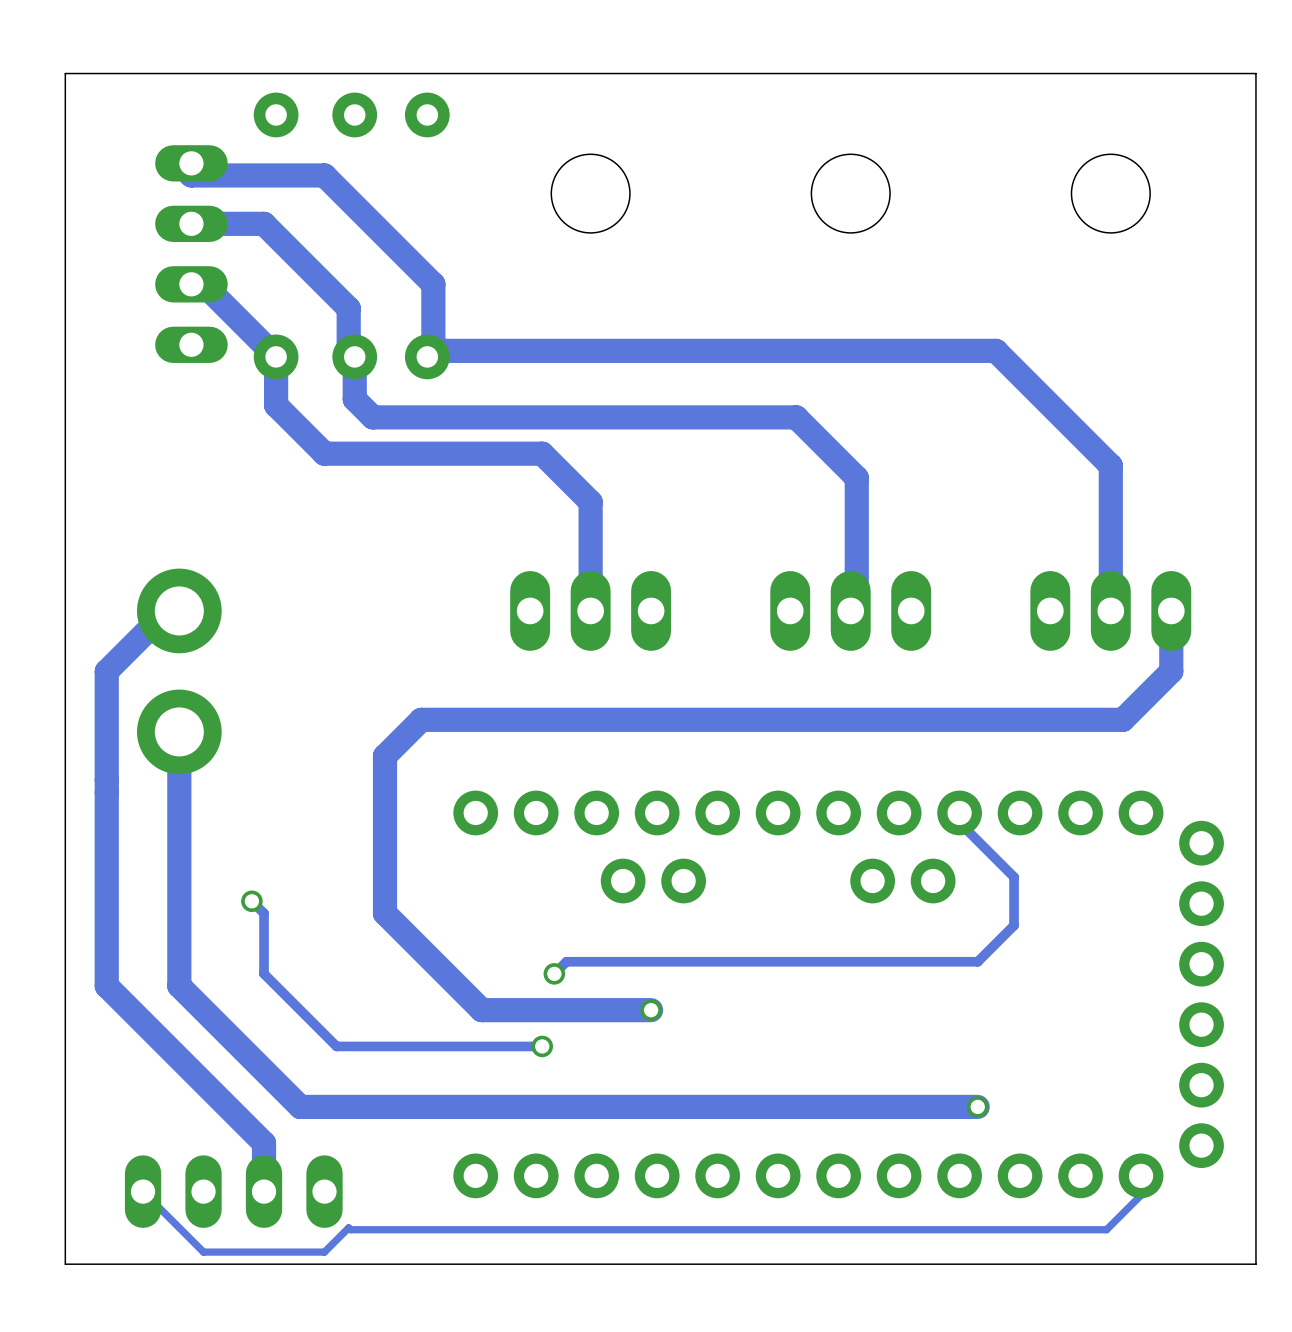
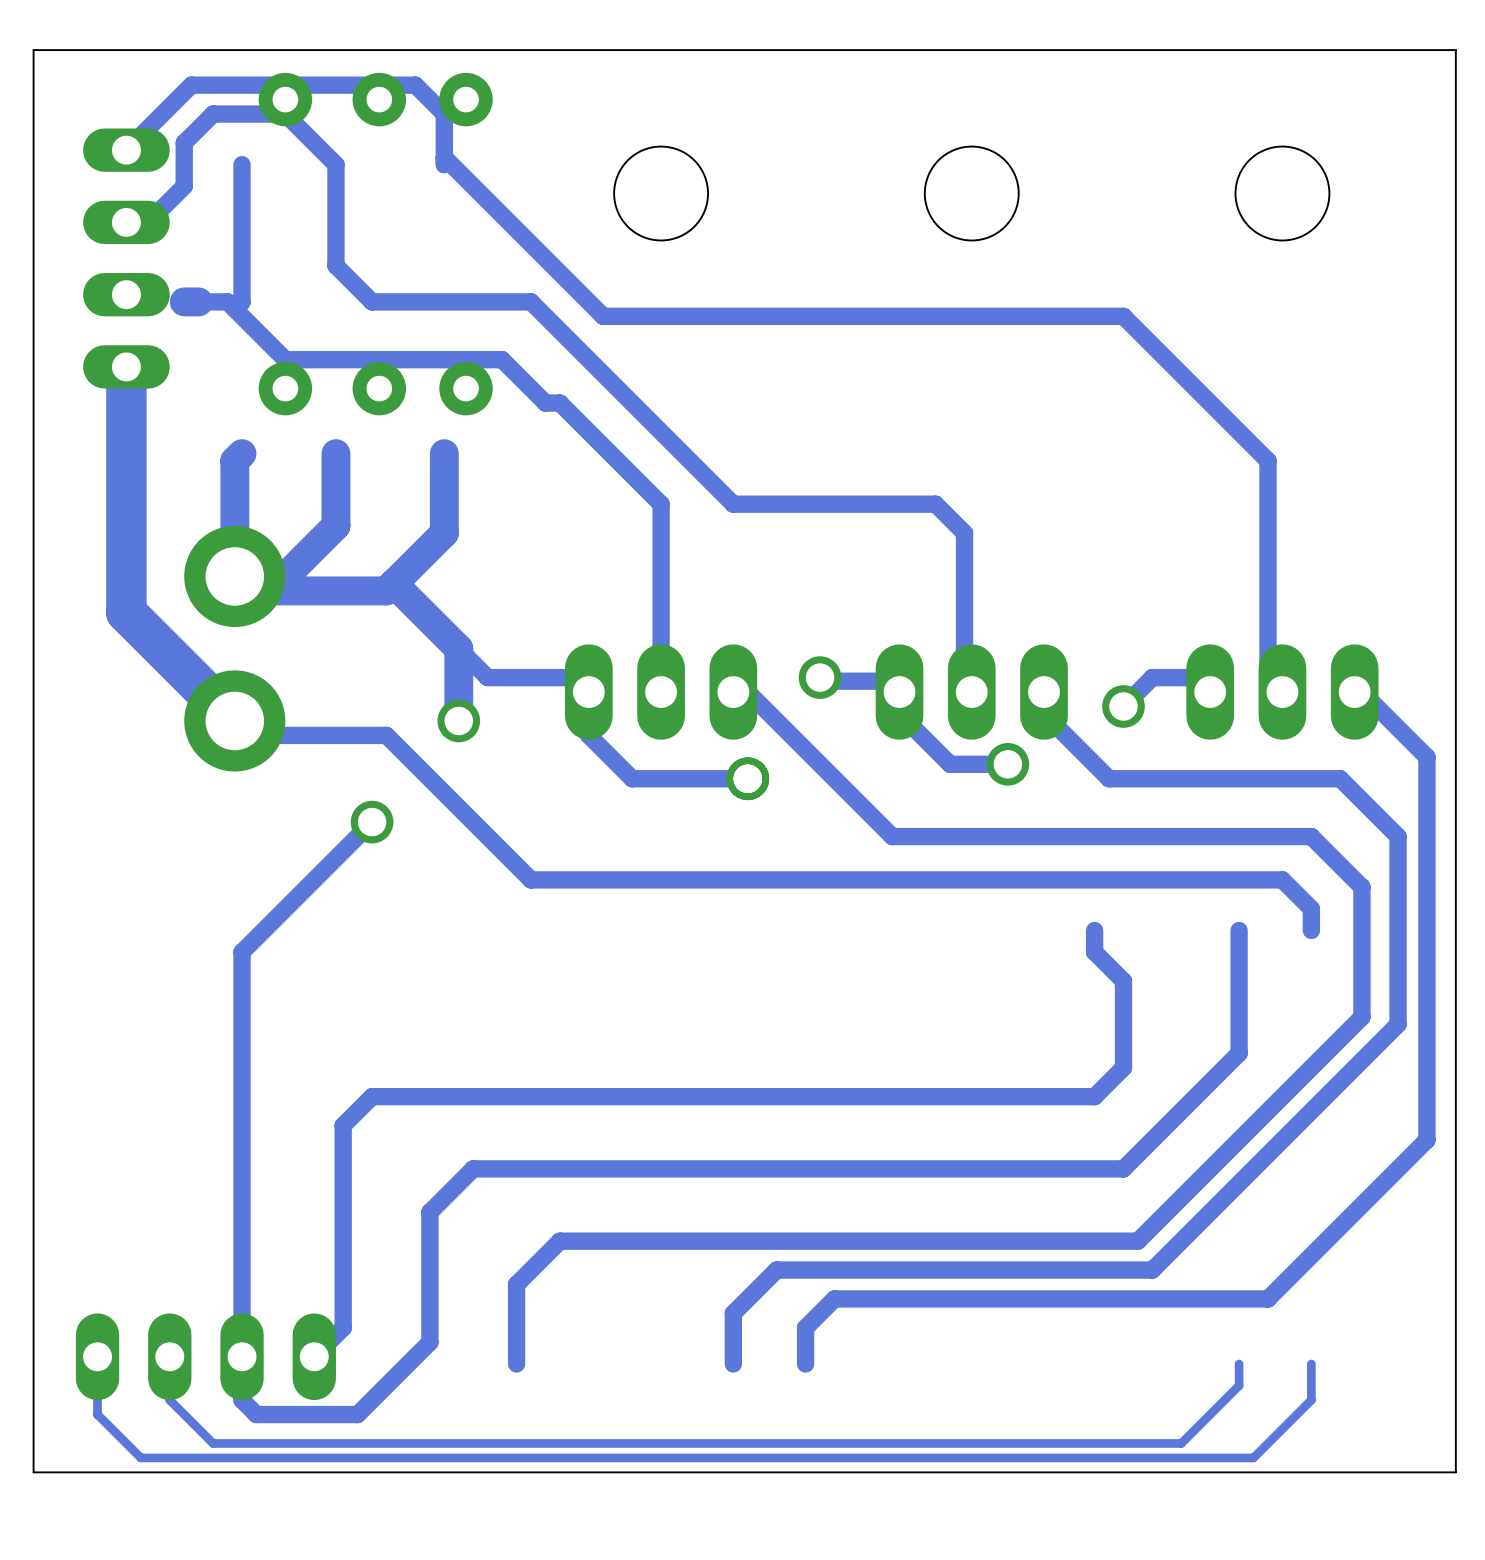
track: none -> (126, 150) (191, 85) (415, 85) (444, 114) (444, 164)
track: (191, 163) (179, 163) (191, 175) (324, 175) (433, 284) (433, 350) -> none
track: none -> (444, 157) (603, 316) (1123, 316) (1267, 460) (1267, 670) (1275, 677)
track: none -> (242, 164) (242, 301) (234, 309)
track: none -> (126, 222) (133, 215) (155, 215) (184, 186) (184, 142) (213, 114) (285, 114) (335, 164) (335, 265) (372, 301) (531, 301) (733, 504) (935, 504) (964, 533) (964, 673) (968, 677)
track: (191, 223) (264, 223) (348, 308) (348, 350) (354, 356) (354, 399) (372, 417) (796, 417) (856, 477) (856, 604) (850, 610) -> none
part position: (191, 254) -> (126, 258)
track: (203, 284) (276, 356) (276, 405) (324, 453) (542, 453) (590, 502) -> (198, 301) (227, 301) (285, 359) (502, 359) (545, 403) (559, 403) (661, 504) (661, 562)
track: none -> (126, 366) (126, 612) (249, 735) (386, 735) (531, 879) (1282, 879) (1311, 908) (1311, 930)
track: (433, 350) (995, 350) (1110, 465) (1110, 610) -> none
track: none -> (242, 453) (234, 460) (234, 576)
track: none -> (335, 453) (335, 525) (285, 576) (234, 576)
track: none -> (444, 453) (444, 533) (386, 590) (249, 590) (234, 576)
track width: thick (590, 502) (590, 598) -> thin (661, 562) (661, 677)
track: none -> (393, 583) (458, 648)
track: none -> (458, 648) (487, 677) (588, 677) (588, 735) (632, 778) (747, 778)
track: none -> (458, 648) (458, 720)
track: none -> (733, 677) (892, 836) (1311, 836) (1361, 887) (1361, 1017) (1137, 1241) (559, 1241) (516, 1284) (516, 1363)
track: none -> (820, 677) (823, 681) (892, 681)
via: none -> (820, 677)
track: none -> (1040, 677) (1040, 710) (1109, 778) (1340, 778) (1398, 836) (1398, 1024) (1152, 1270) (776, 1270) (733, 1313) (733, 1363)
track: none -> (1202, 677) (1152, 677) (1123, 706)
track: none -> (1347, 677) (1426, 757) (1426, 1140) (1267, 1298) (834, 1298) (805, 1327) (805, 1363)
track: none -> (892, 681) (892, 706) (950, 764) (1007, 764)
track: (179, 610) (167, 610) (106, 671) (106, 985) (264, 1143) (264, 1191) -> none
track: (1171, 610) (1171, 671) (1122, 719) (421, 719) (384, 756) (384, 913) (481, 1010) -> (372, 822) (242, 952) (242, 1400) (256, 1414) (357, 1414) (429, 1342) (429, 1212) (473, 1168) (531, 1168)
via: none -> (1123, 706)
via: none -> (458, 720)
part position: (179, 671) -> (234, 648)
via: none -> (1007, 764)
via: none -> (747, 778)
via: none -> (372, 822)
track: (179, 731) (179, 985) (300, 1106) (977, 1106) -> none
track: none -> (1094, 930) (1094, 952) (1123, 981) (1123, 1067) (1094, 1096) (372, 1096) (343, 1125) (343, 1327) (314, 1356)
track: none -> (1239, 930) (1239, 1053) (1123, 1168) (733, 1168)
track: (959, 812) (959, 822) (1014, 877) (1014, 925) (977, 961) (566, 961) (554, 973) -> none
track: (251, 901) (264, 913) (264, 973) (336, 1046) (542, 1046) -> none
via: (251, 901) -> none
via: (554, 973) -> none
part: (838, 994) -> none
track width: thick (651, 1010) (481, 1010) -> thin (733, 1168) (531, 1168)
via: (651, 1010) -> none
via: (542, 1046) -> none
via: (977, 1106) -> none
track: none -> (169, 1356) (169, 1400) (213, 1443) (1181, 1443) (1239, 1385) (1239, 1363)
track: (1141, 1173) (1141, 1195) (1106, 1229) (350, 1229) (348, 1227) (324, 1252) -> (1311, 1363) (1311, 1400) (1253, 1457) (343, 1457)
track: (143, 1191) (203, 1252) -> (97, 1356) (97, 1414) (140, 1457) (198, 1457)
part position: (233, 1191) -> (205, 1356)

